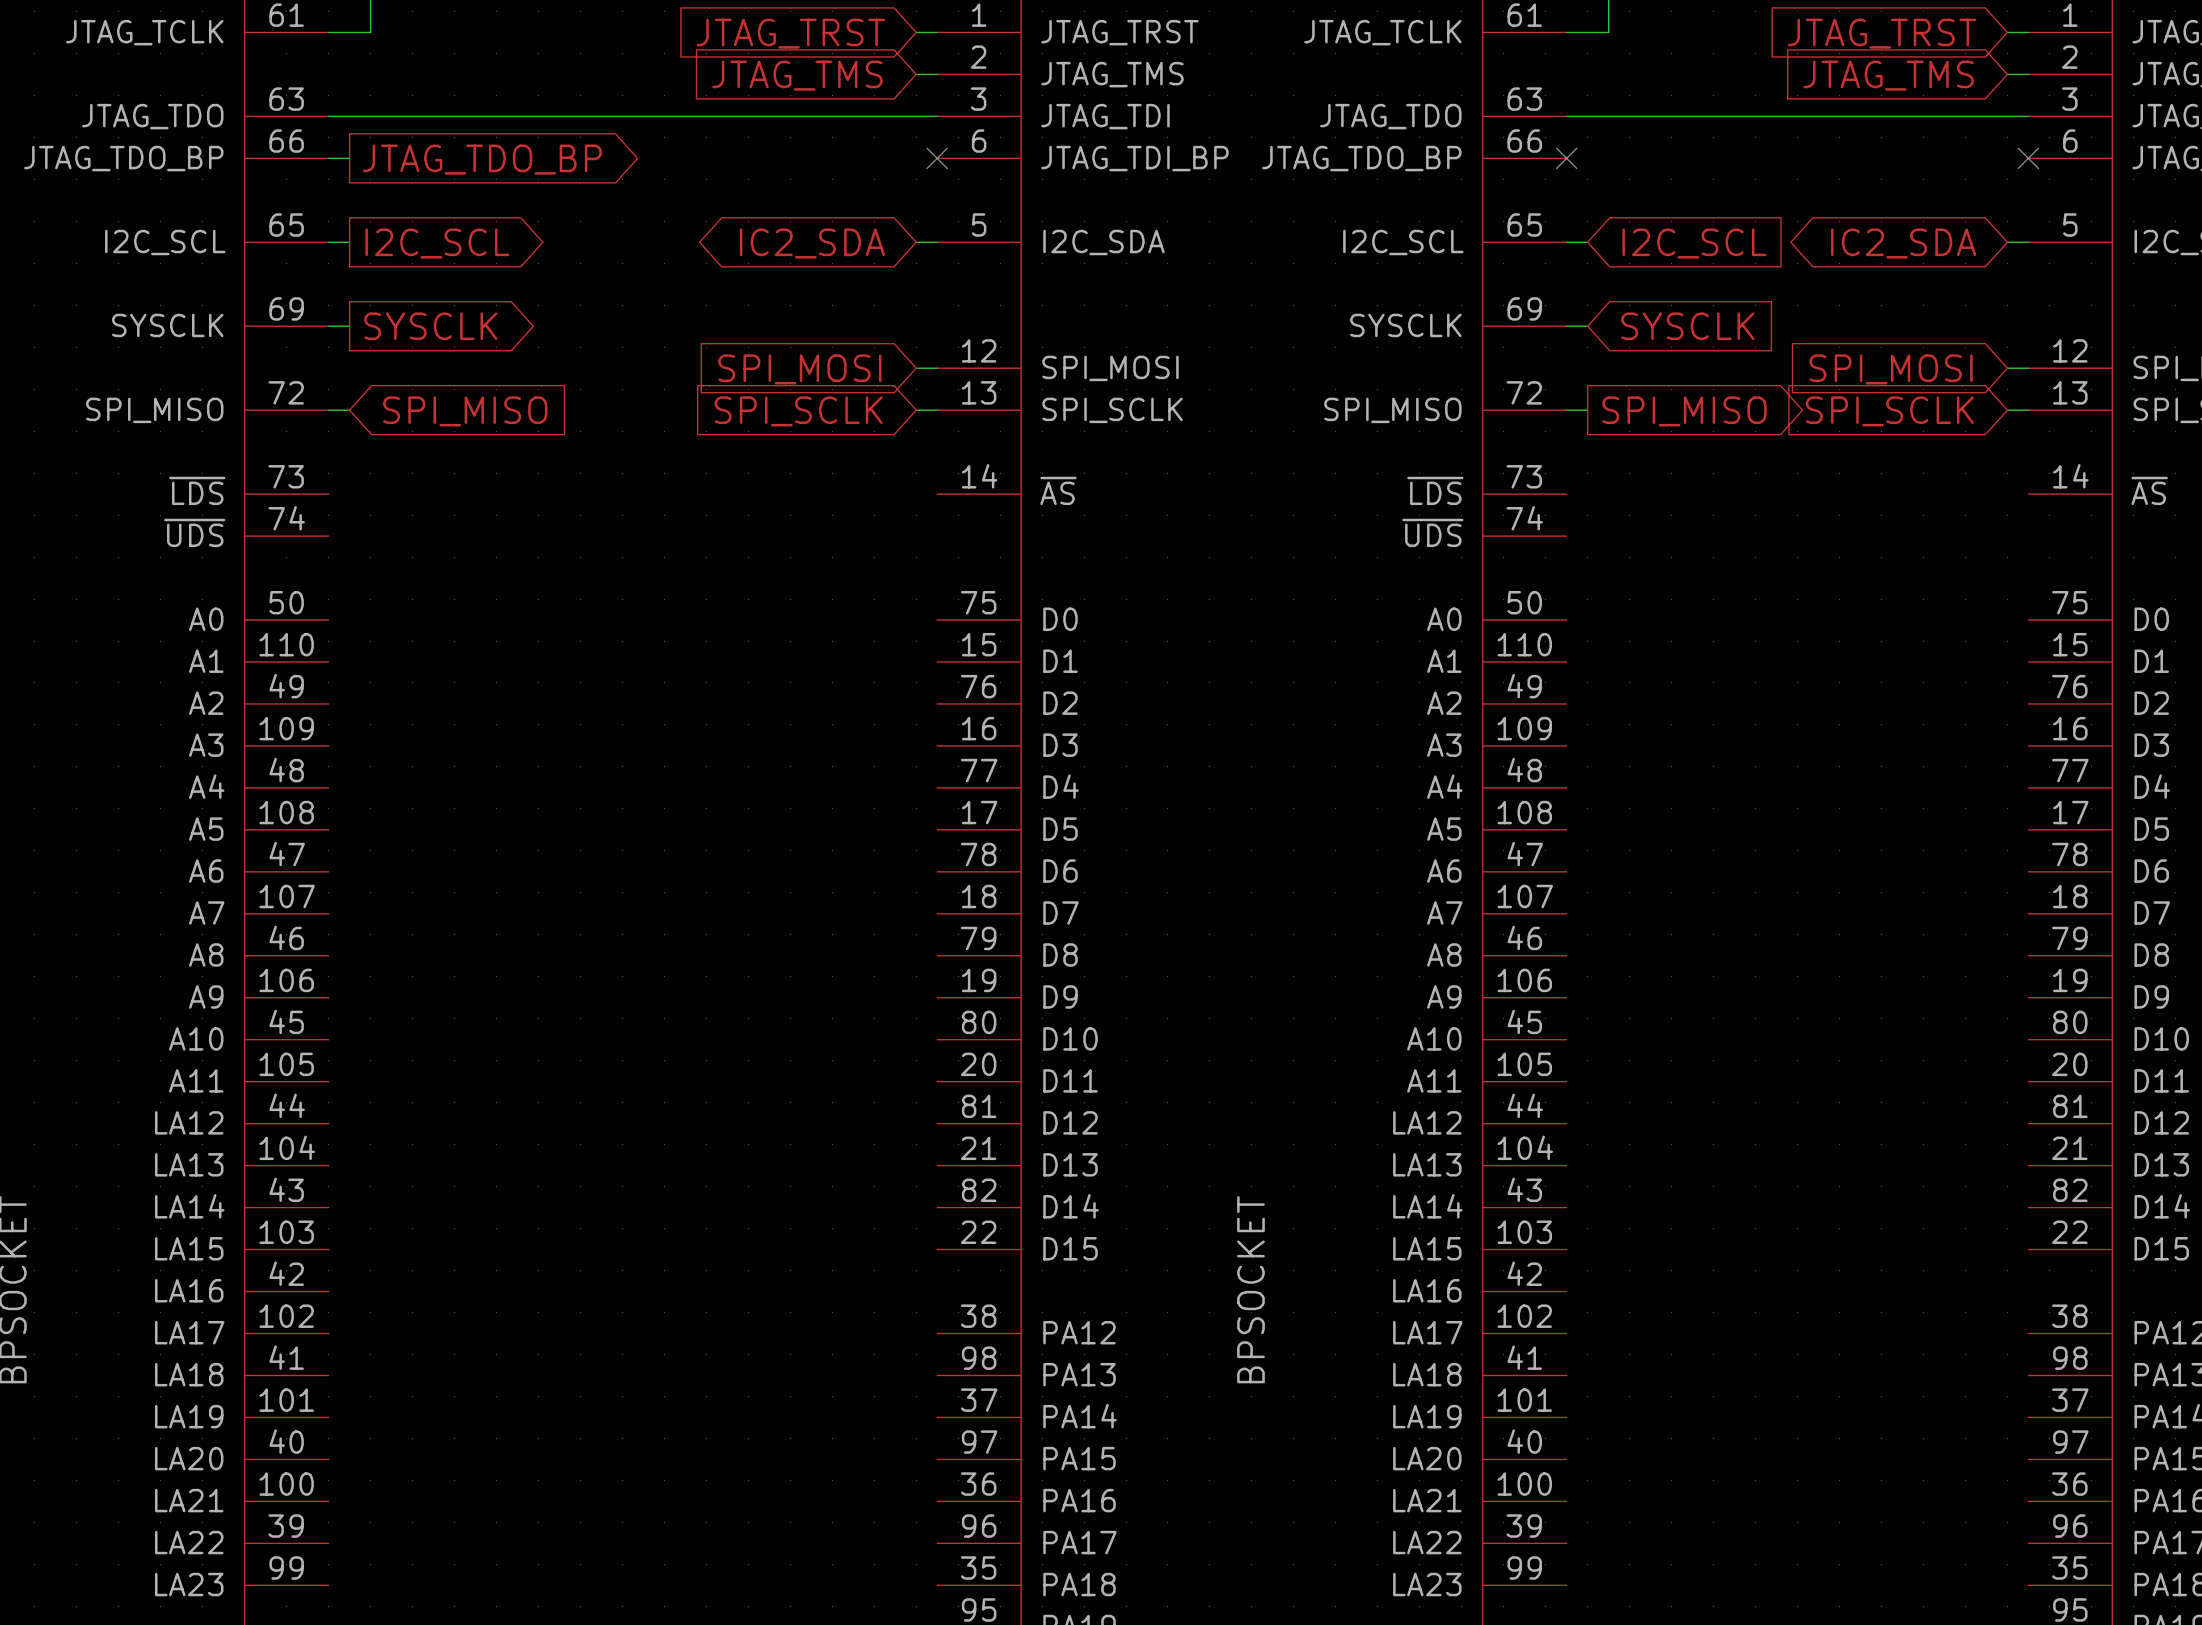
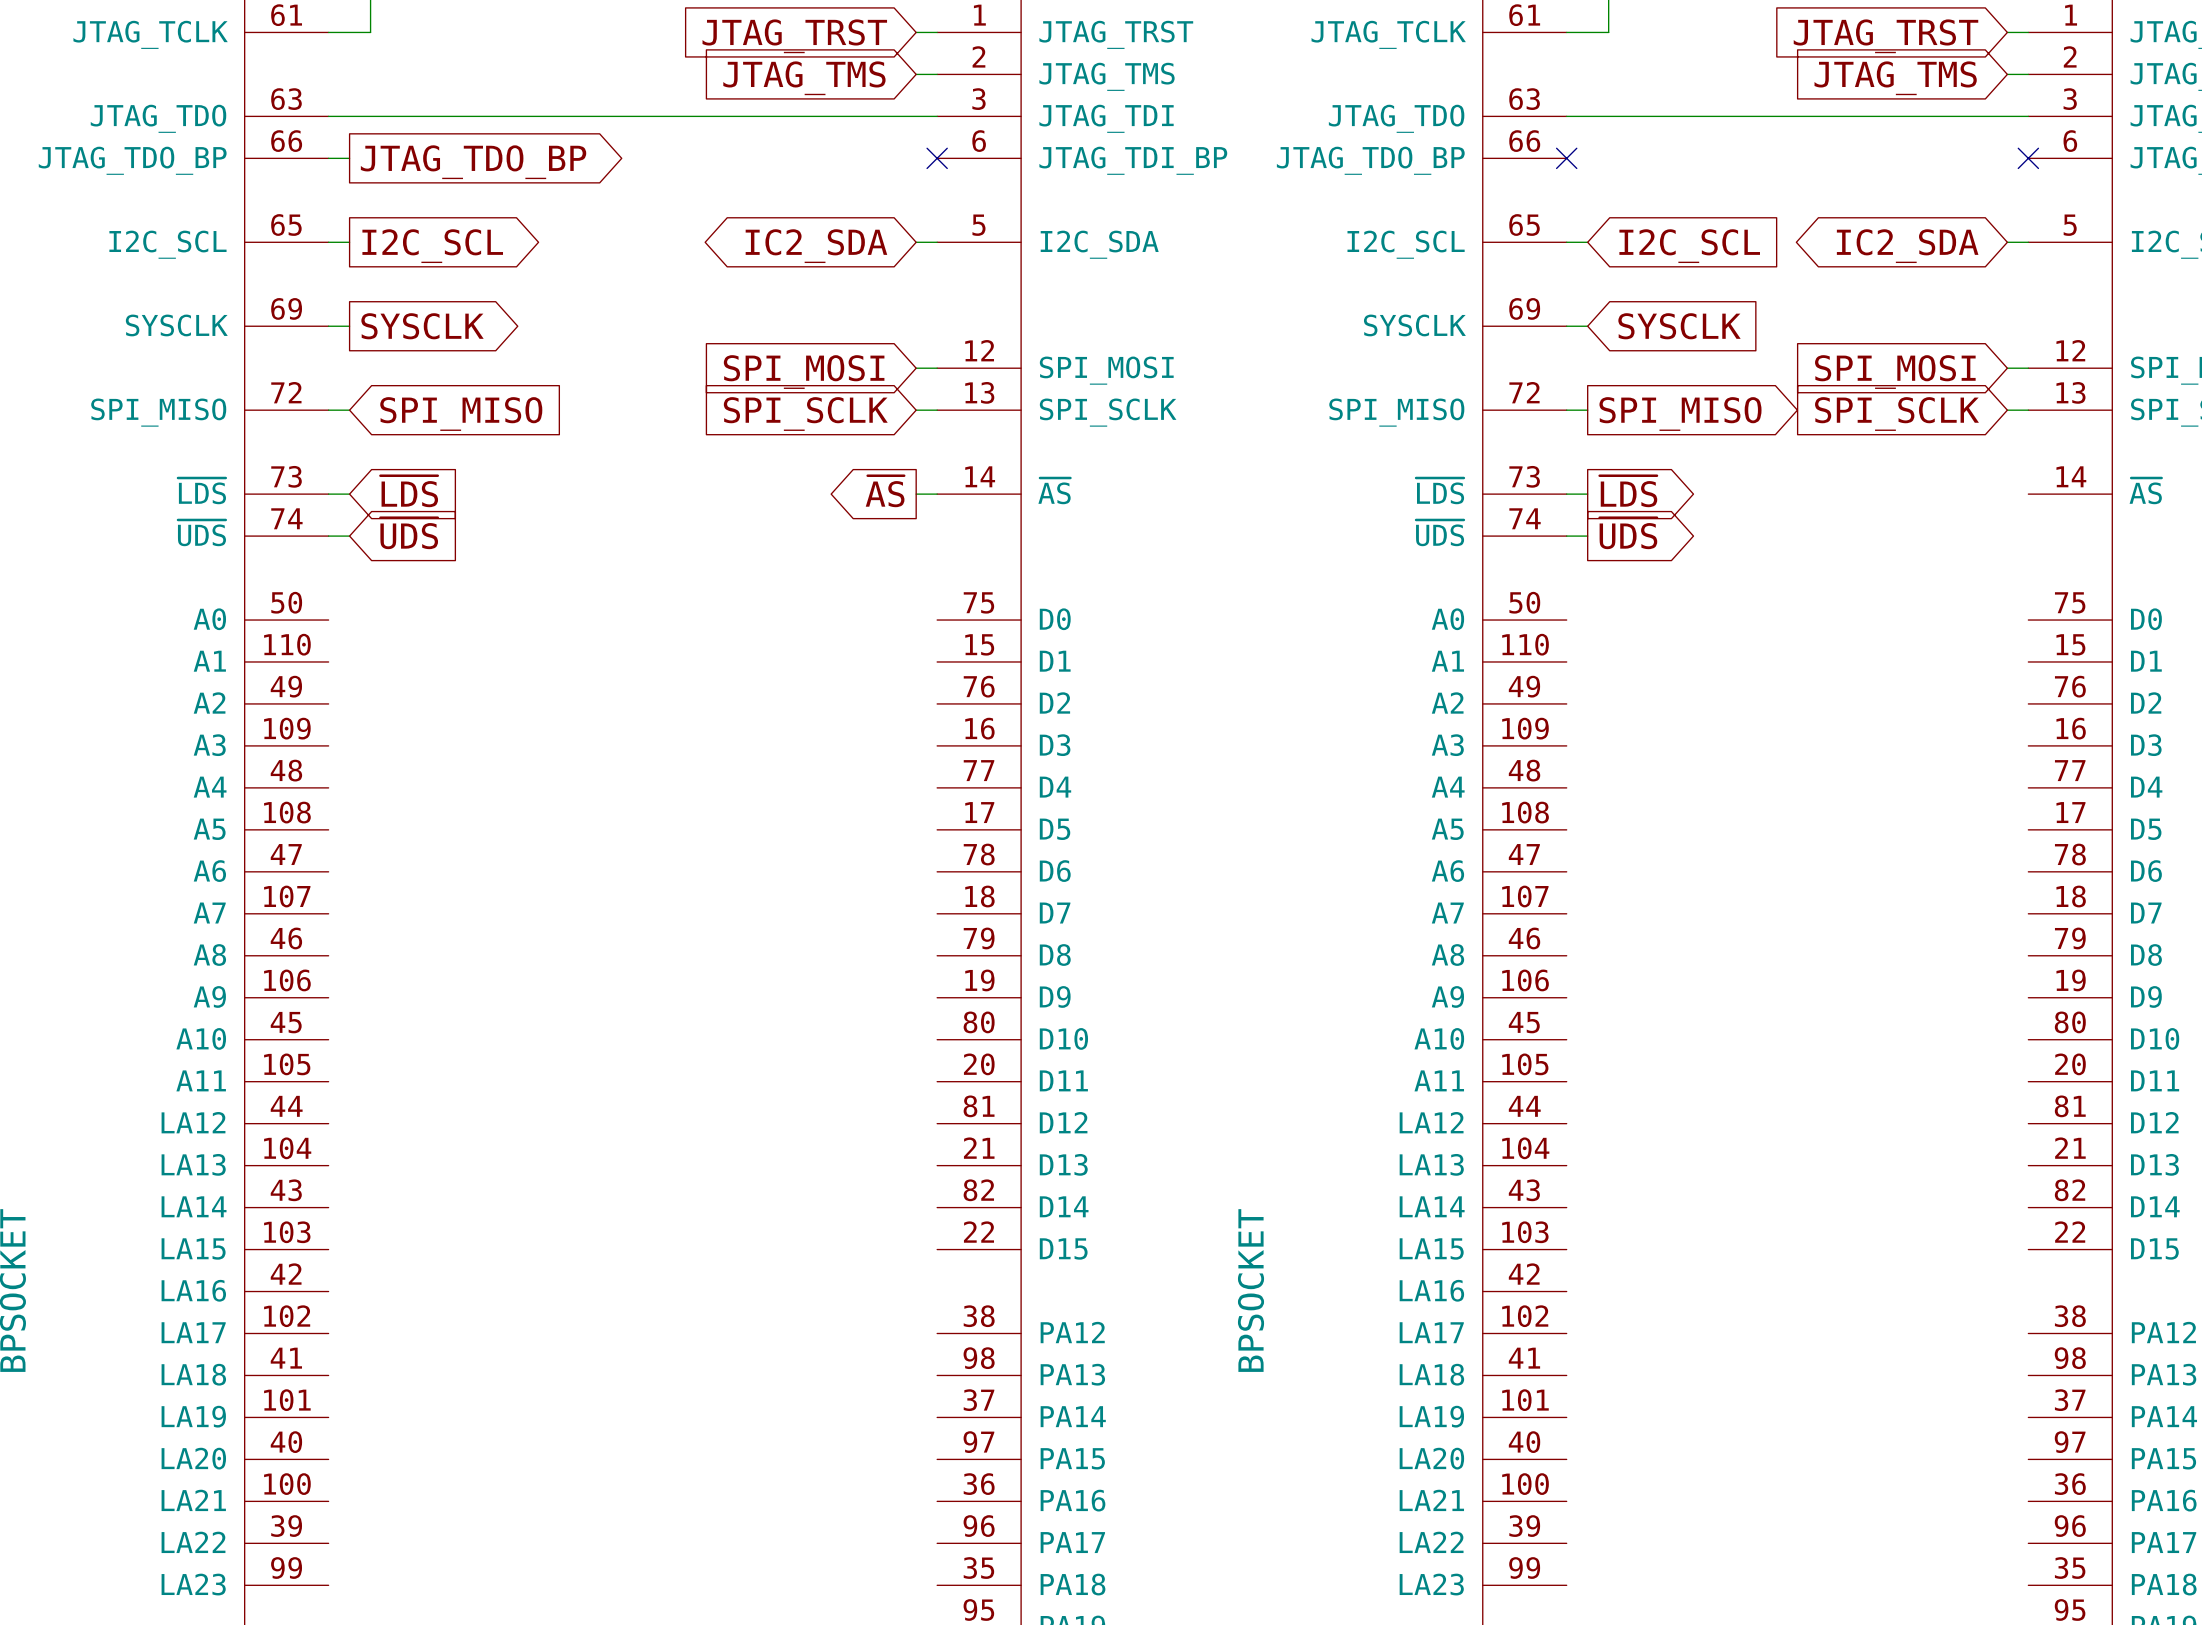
global label: none -> ~{LDS} (409, 491)
global label: none -> ~{AS} (885, 491)
global label: none -> ~{LDS} (1628, 491)
wire: none -> (328, 494) (349, 494)
wire: none -> (916, 494) (937, 494)
wire: none -> (1566, 494) (1587, 494)
global label: none -> ~{UDS} (409, 533)
global label: none -> ~{UDS} (1628, 533)
wire: none -> (328, 536) (349, 536)
wire: none -> (1566, 536) (1587, 536)

